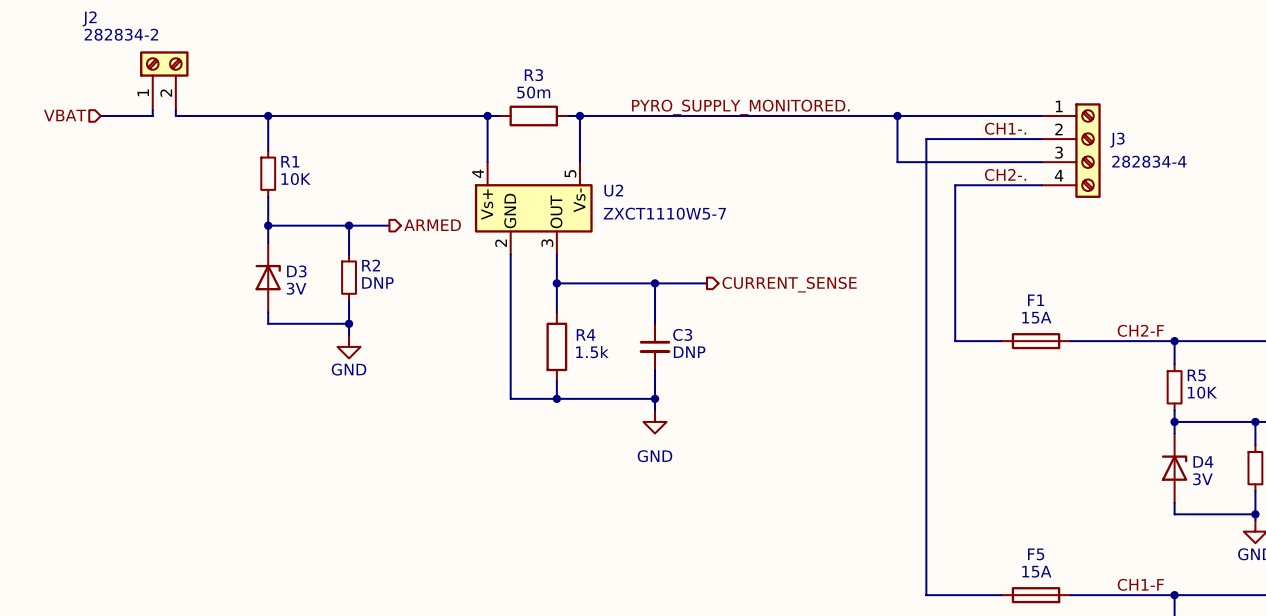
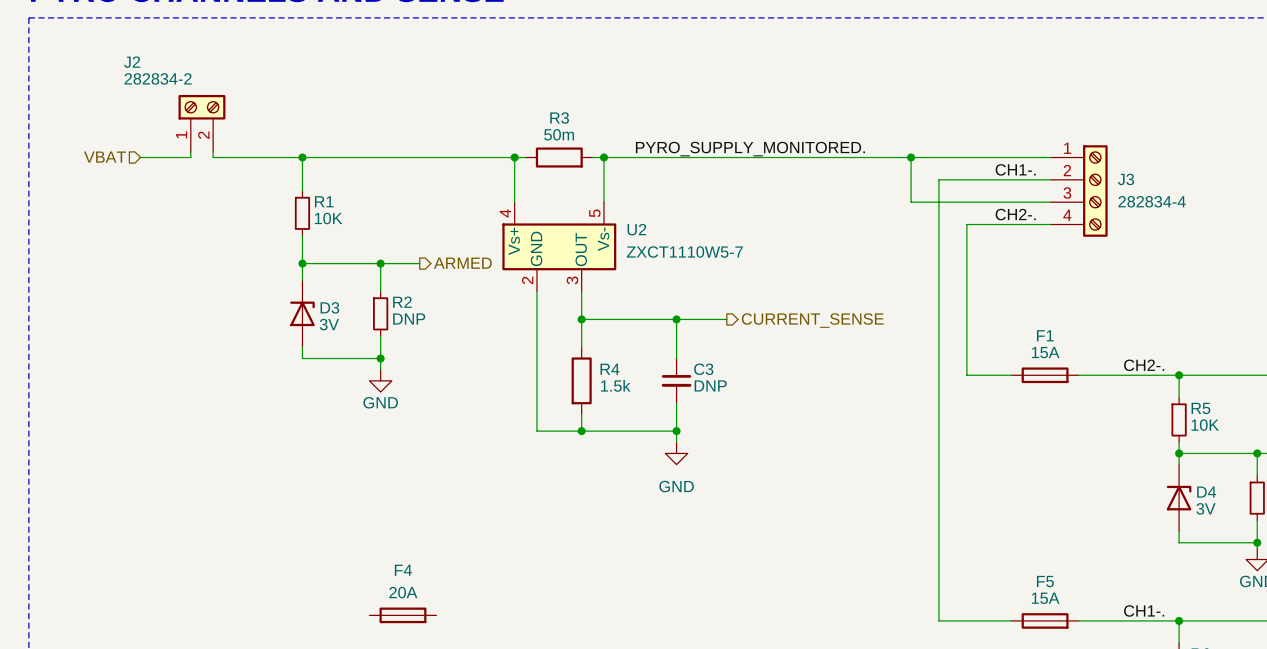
label: CH2-F (1140, 330) -> CH2-. (1144, 365)
label: CH1-F (1140, 584) -> CH1-. (1144, 610)
F4: none -> 20A (402, 615)

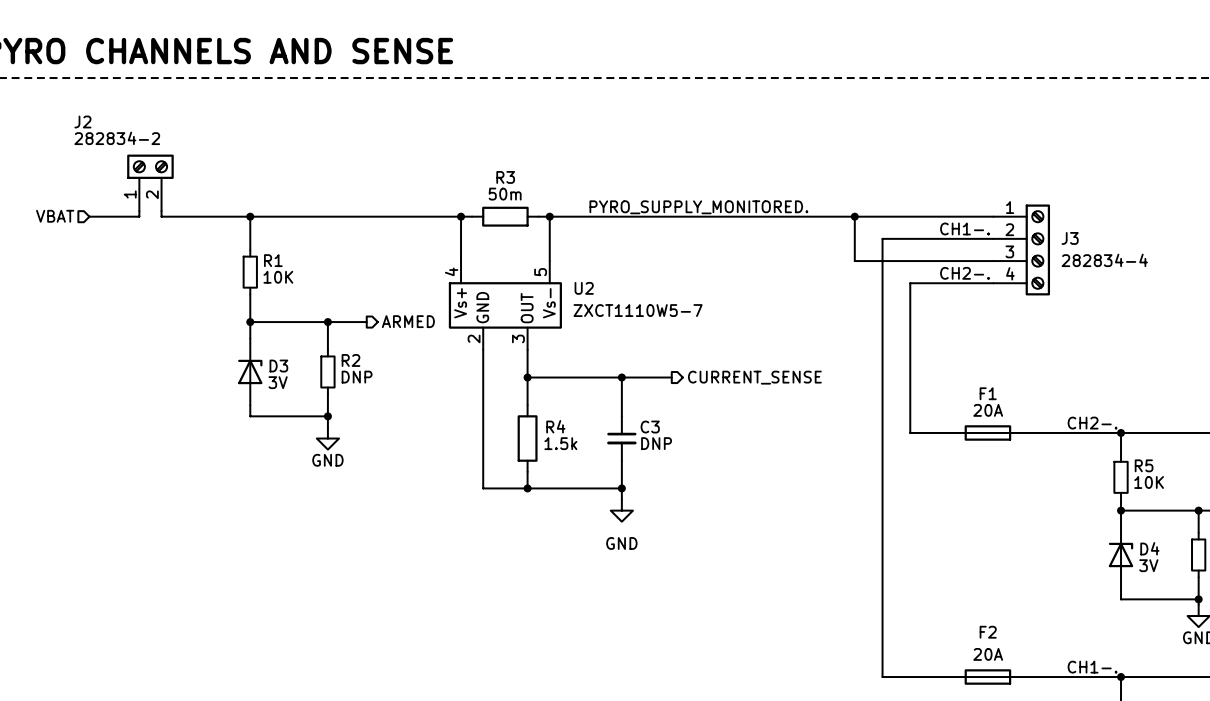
F1 value: 15A (1045, 352) -> 20A (988, 410)
F5 name: F5 (1045, 581) -> F2 (988, 632)
F5 value: 15A (1045, 598) -> 20A (988, 654)
F4: 20A (402, 615) -> none

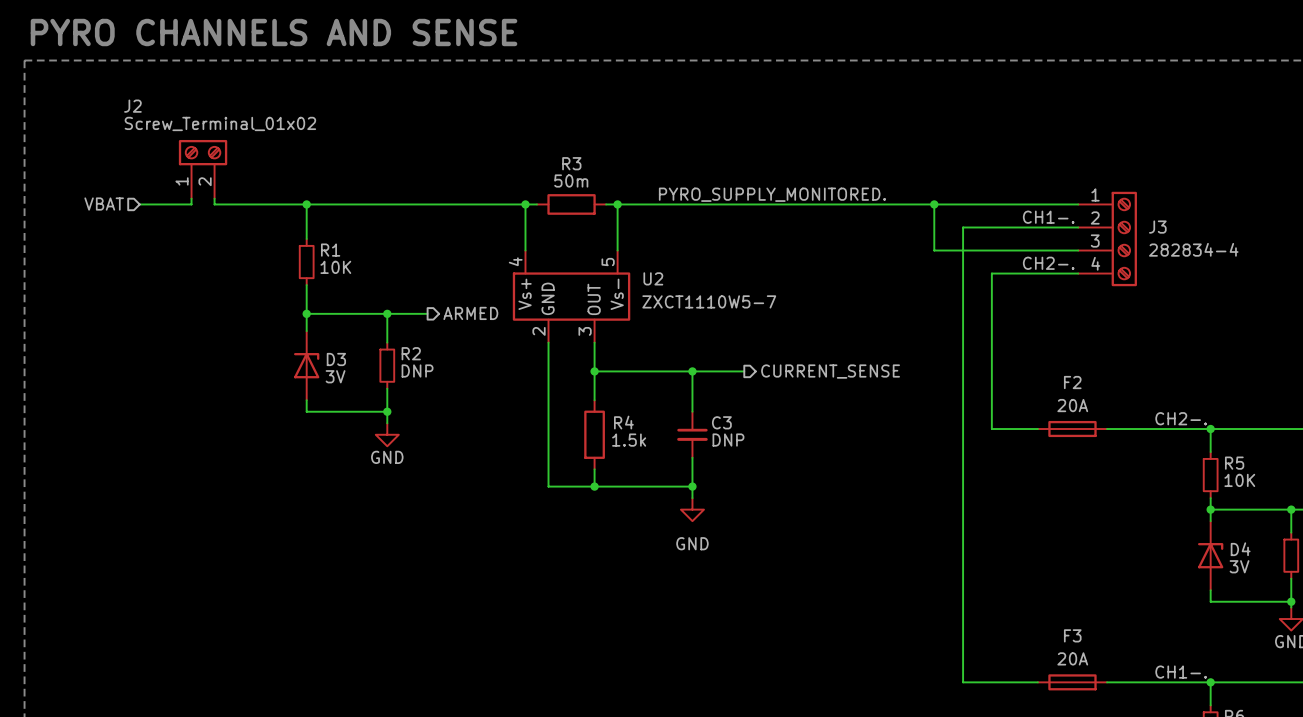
J2 value: 282834-2 (117, 138) -> Screw_Terminal_01x02 (220, 123)
F1 name: F1 (988, 393) -> F2 (1072, 382)
F2 name: F2 (988, 632) -> F3 (1072, 635)

